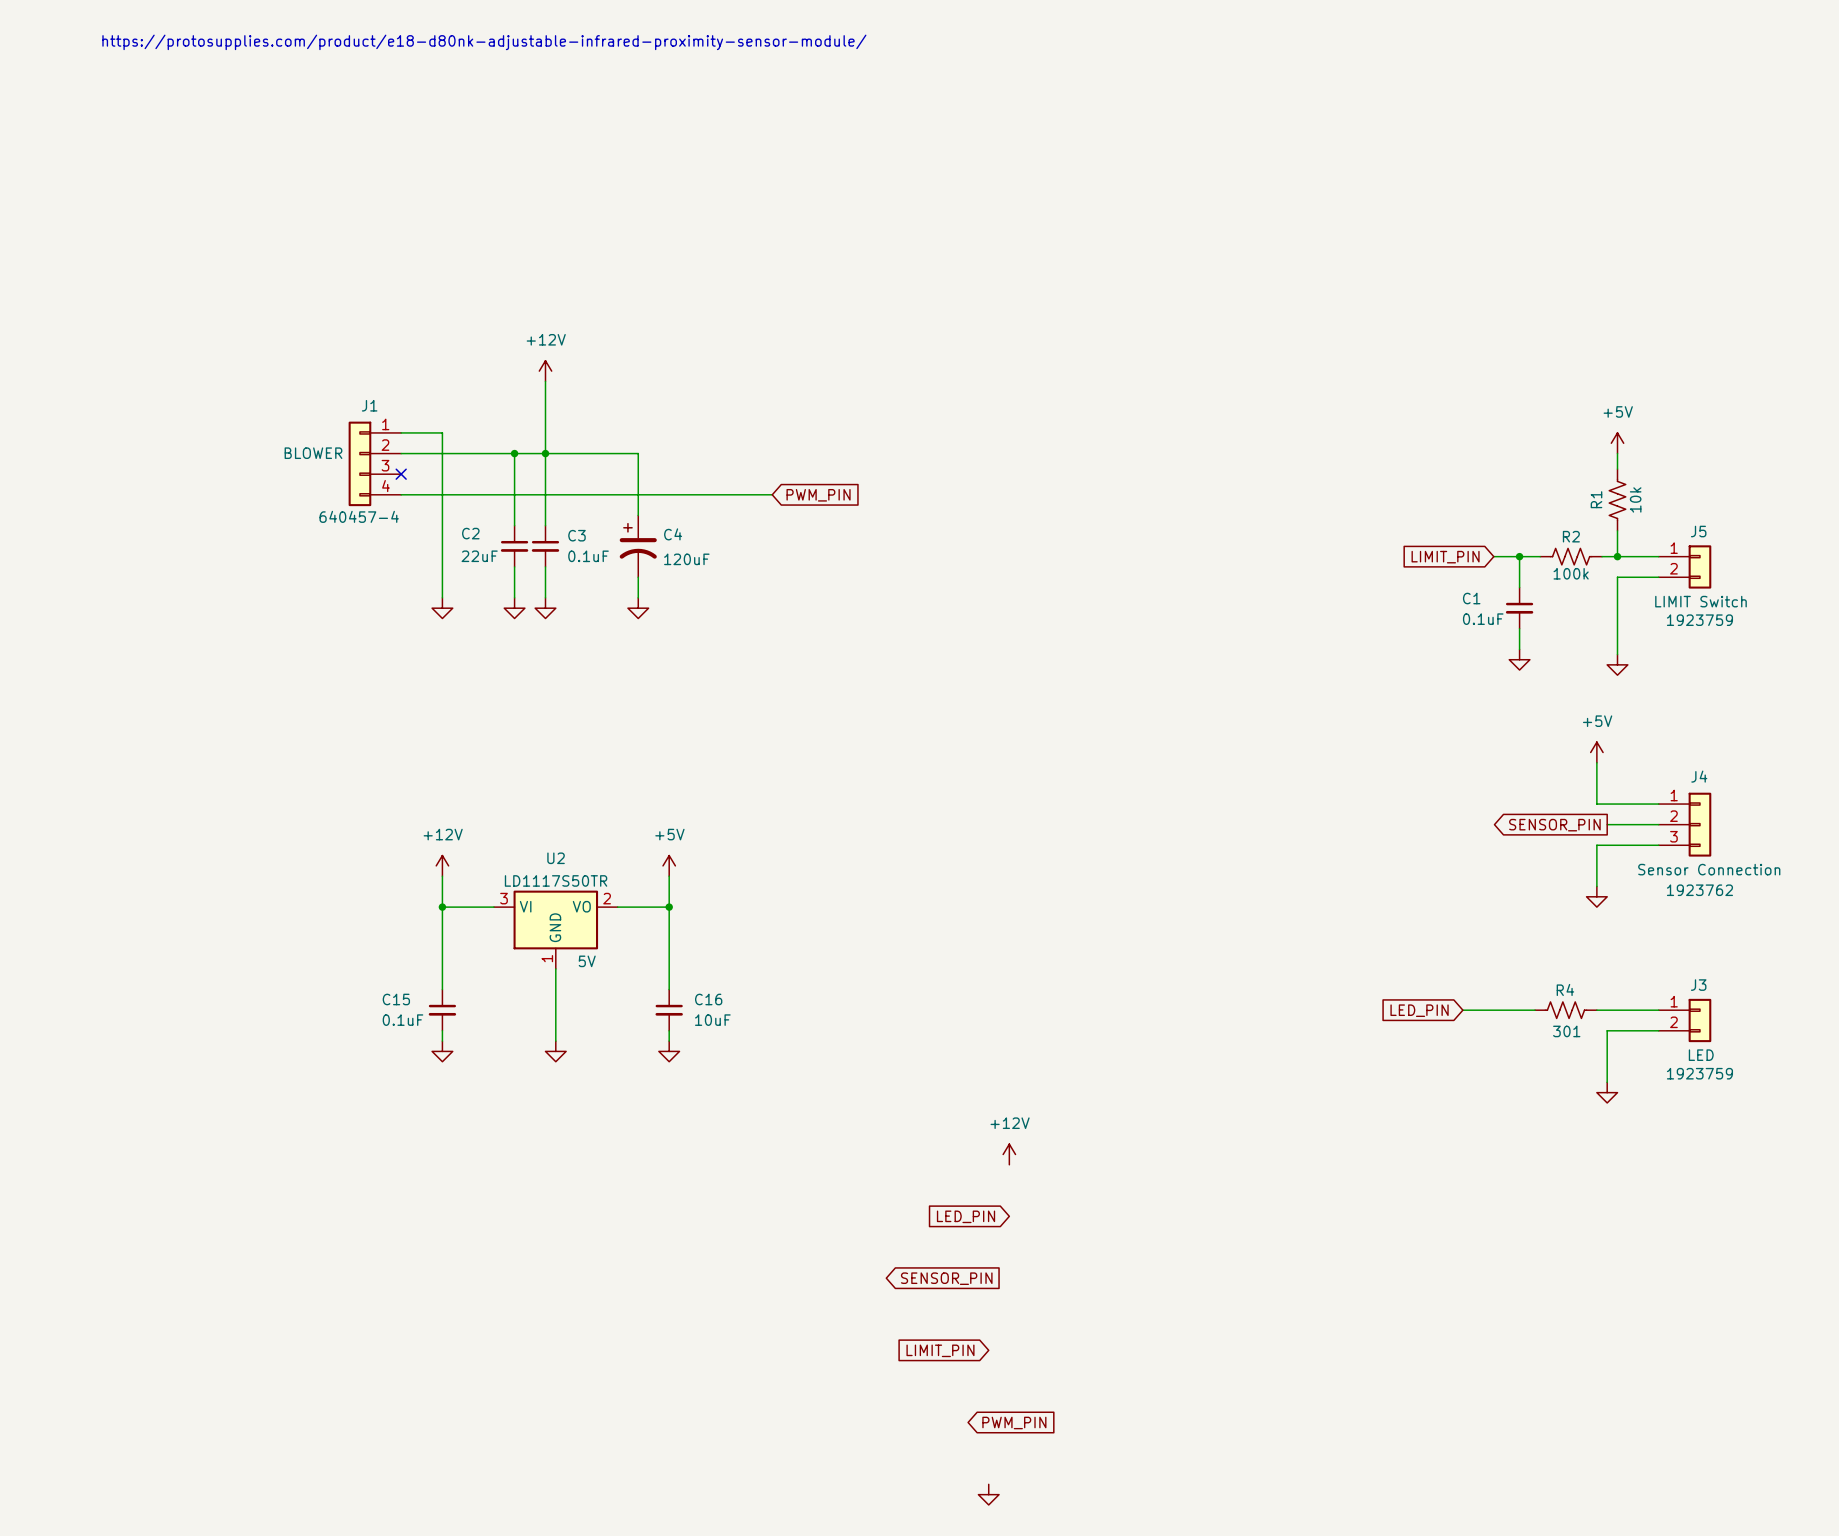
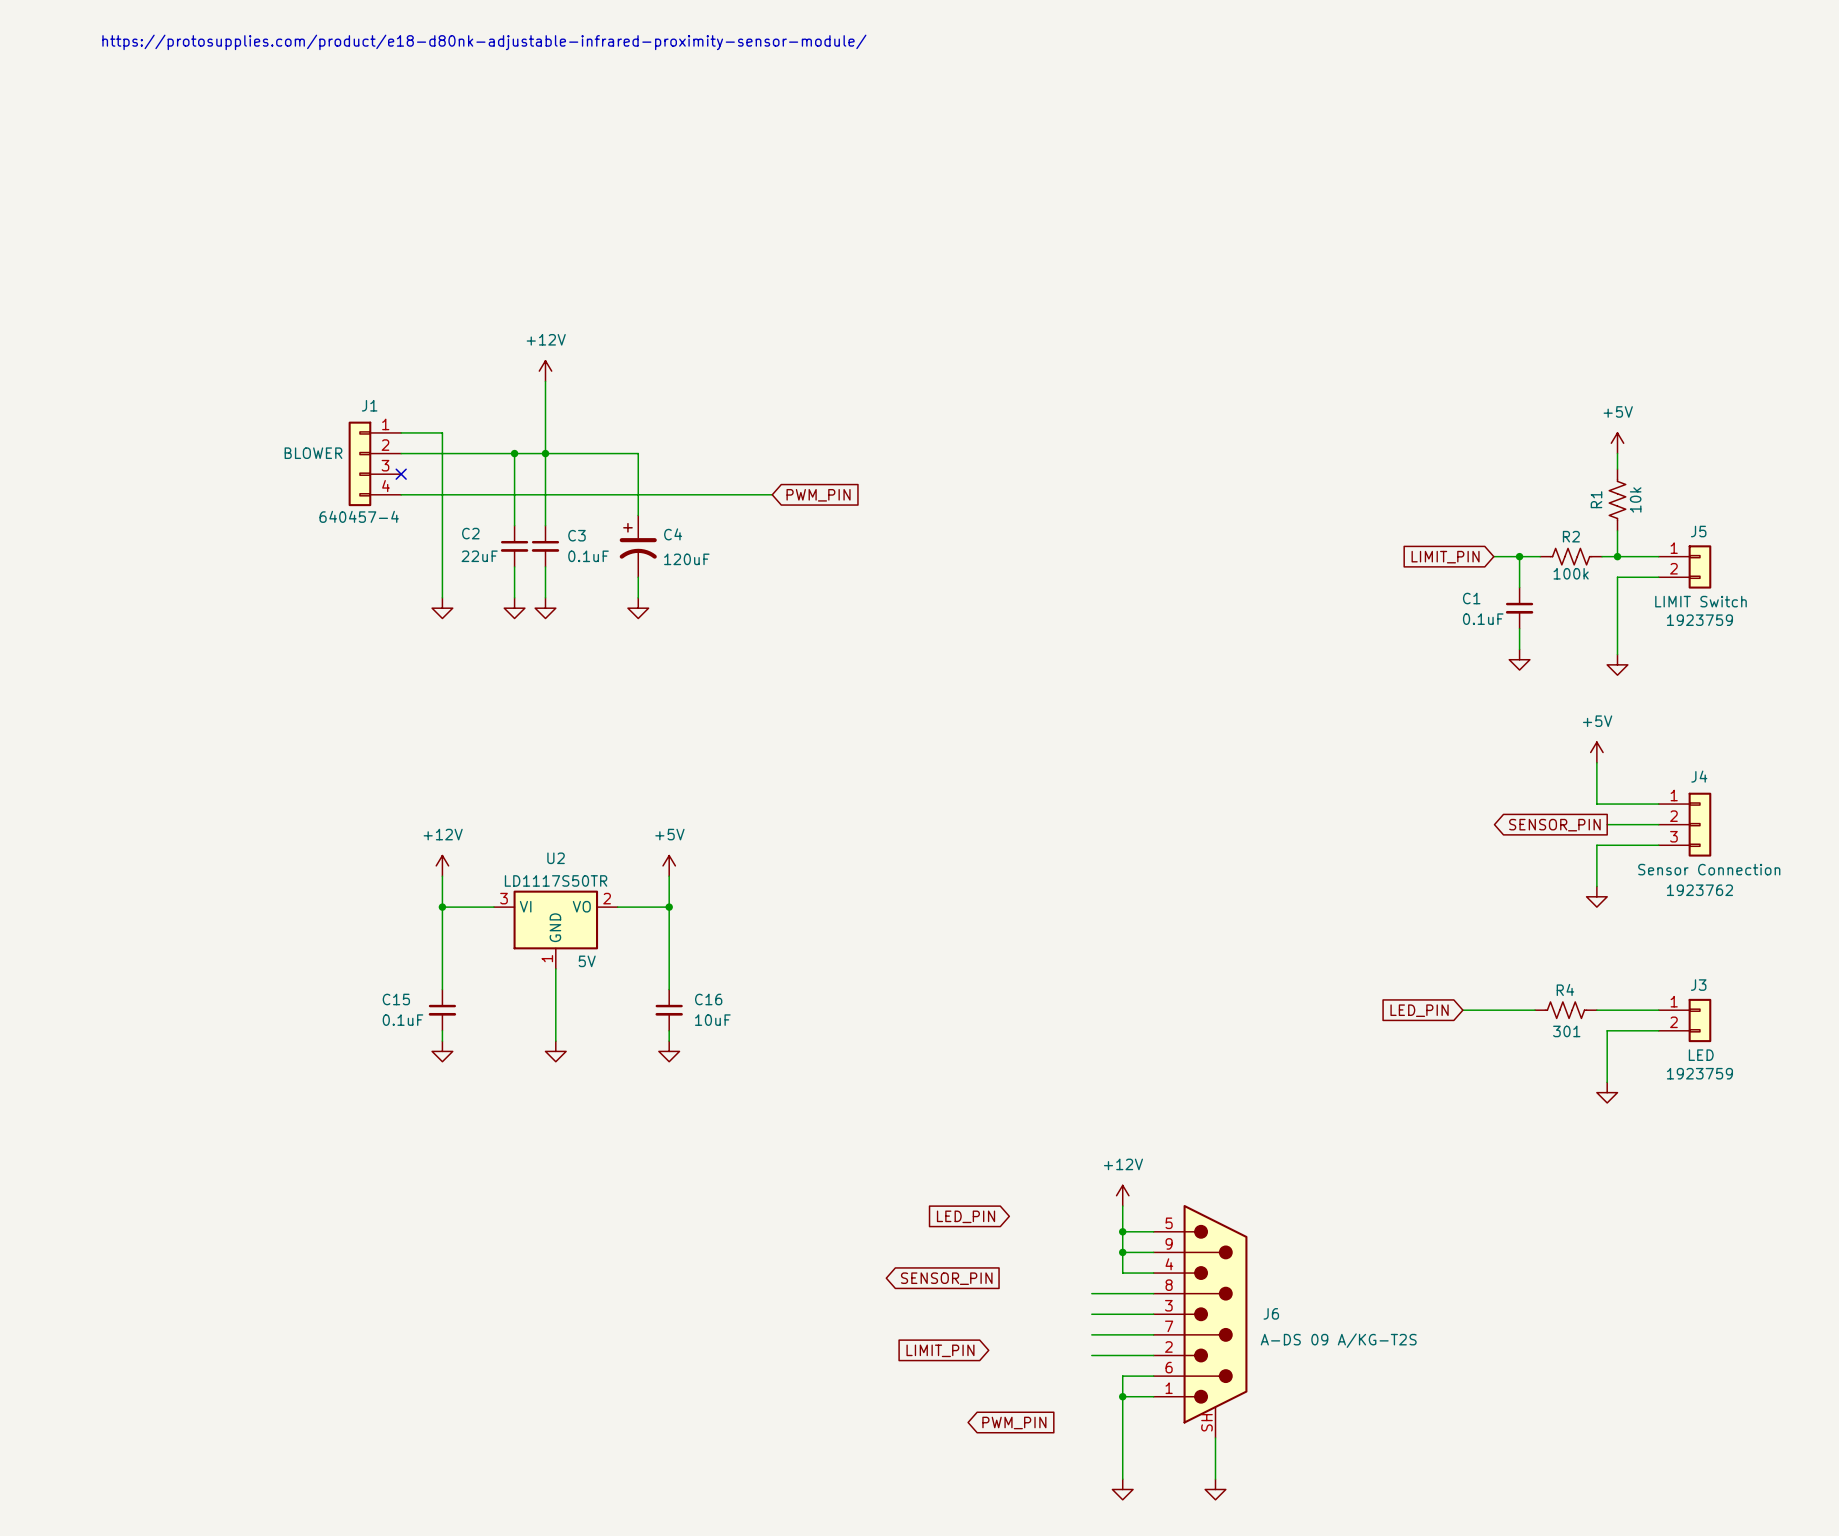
power symbol position: +12V (1009, 1154) -> +12V (1122, 1195)
wire: none -> (1122, 1206) (1122, 1273) (1153, 1273)
wire: none -> (1122, 1231) (1153, 1231)
junction: none -> (1122, 1231)
wire: none -> (1122, 1252) (1153, 1252)
junction: none -> (1122, 1252)
wire: none -> (1091, 1293) (1153, 1293)
wire: none -> (1091, 1314) (1153, 1314)
J6: none -> (1200, 1321)
wire: none -> (1091, 1334) (1153, 1334)
wire: none -> (1091, 1355) (1153, 1355)
wire: none -> (1153, 1376) (1122, 1376) (1122, 1479)
wire: none -> (1122, 1396) (1153, 1396)
junction: none -> (1122, 1396)
wire: none -> (1215, 1437) (1215, 1479)
power symbol: none -> (1122, 1489)
power symbol: none -> (1215, 1489)
power symbol: (988, 1494) -> none

